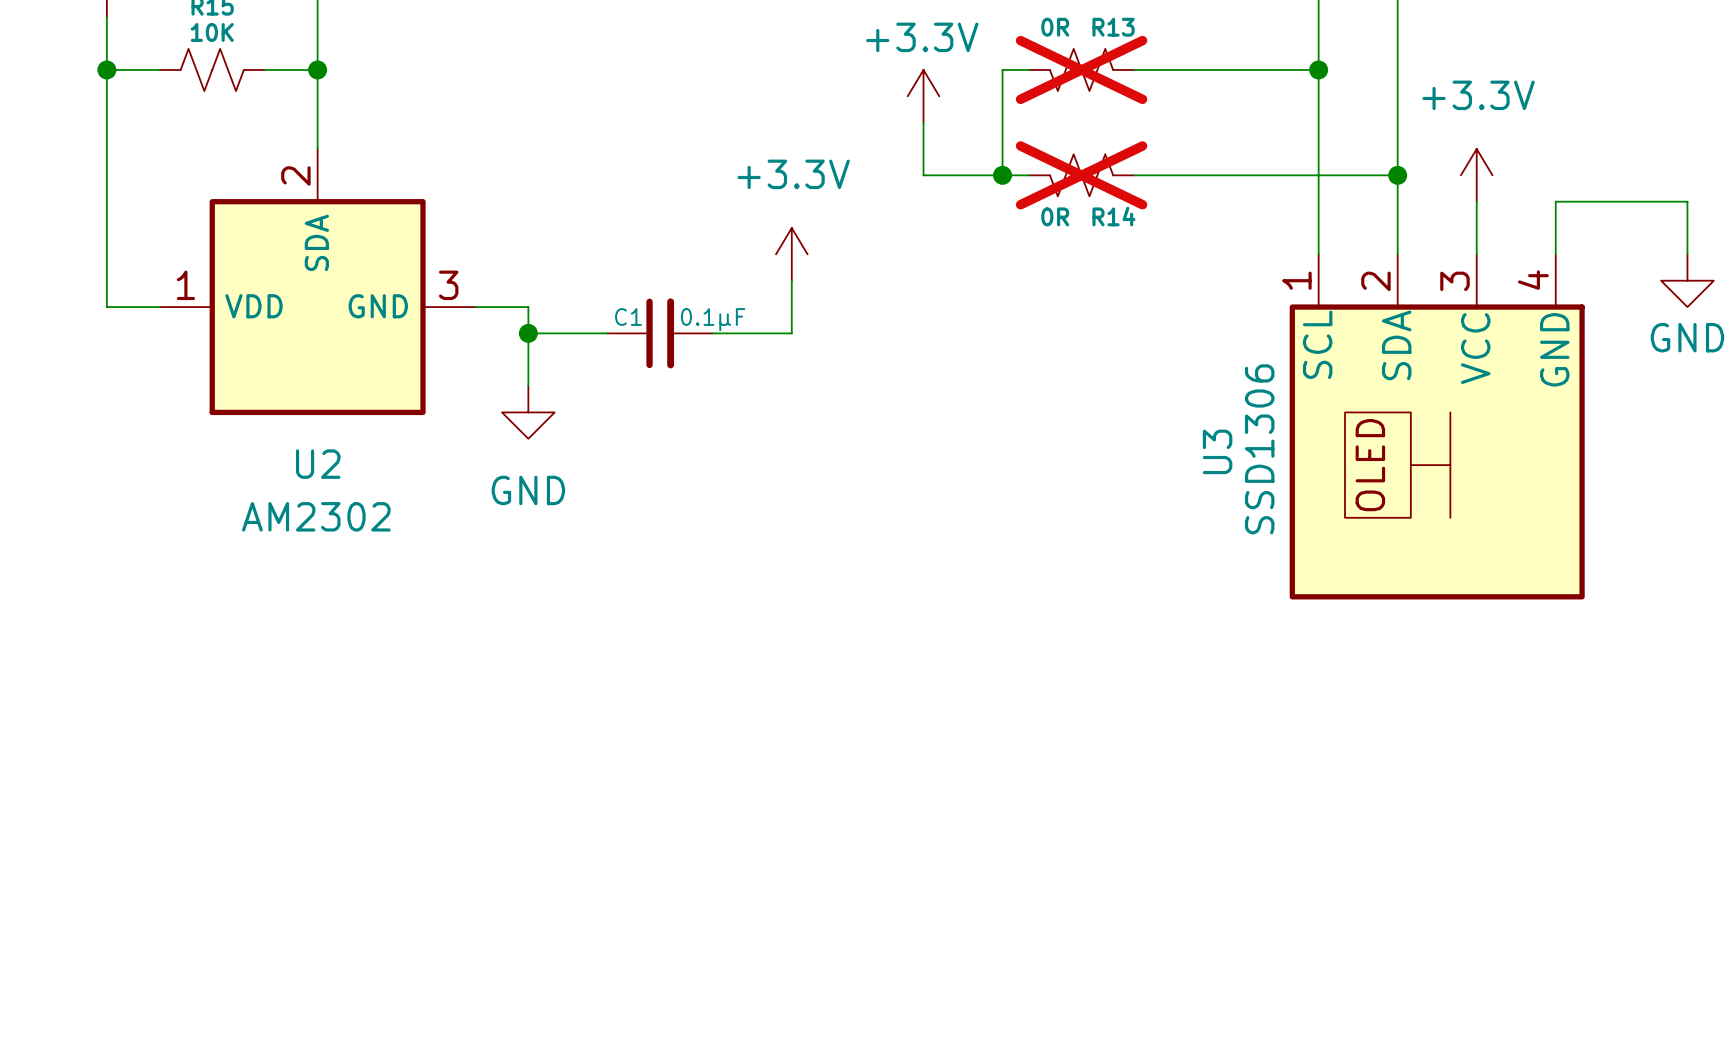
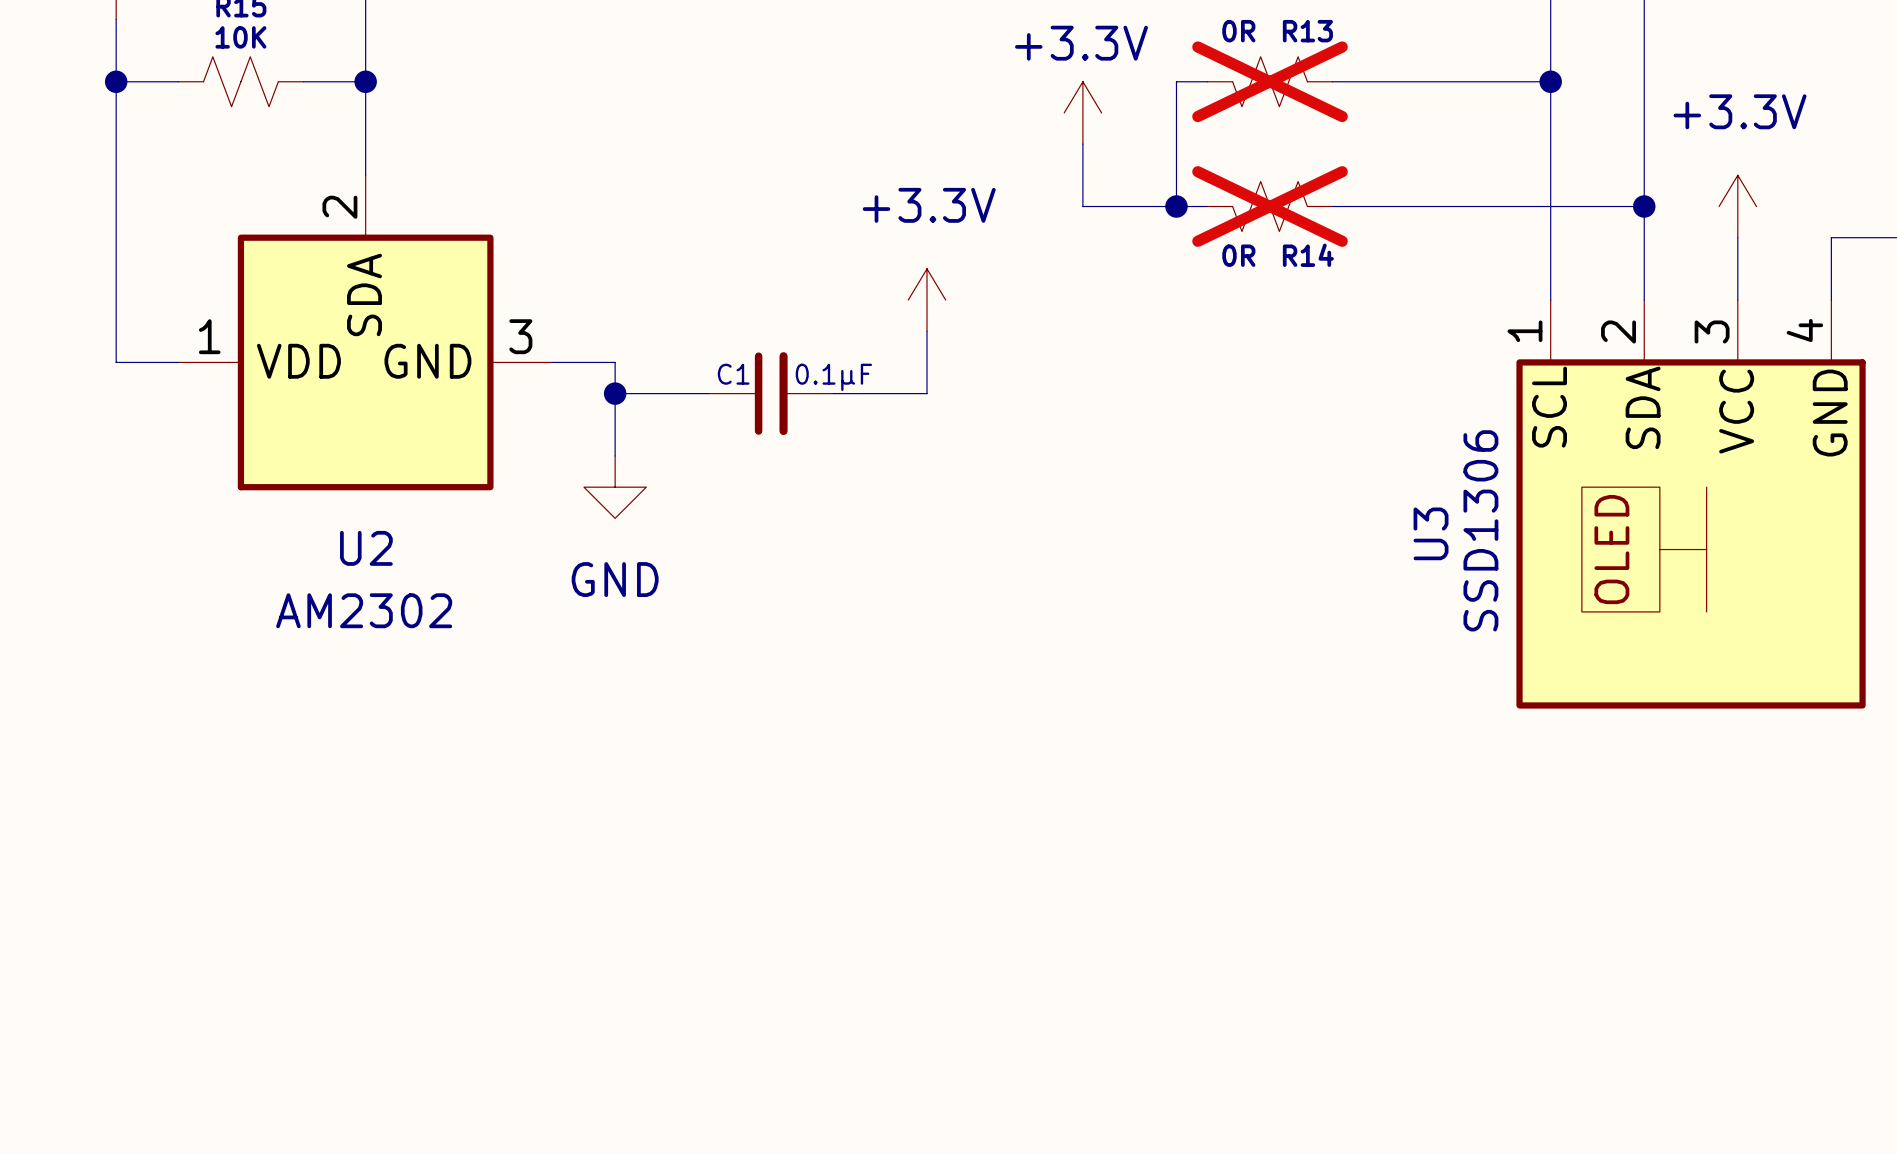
U2 symbol: [159, 149, 476, 416] -> [178, 175, 553, 491]

